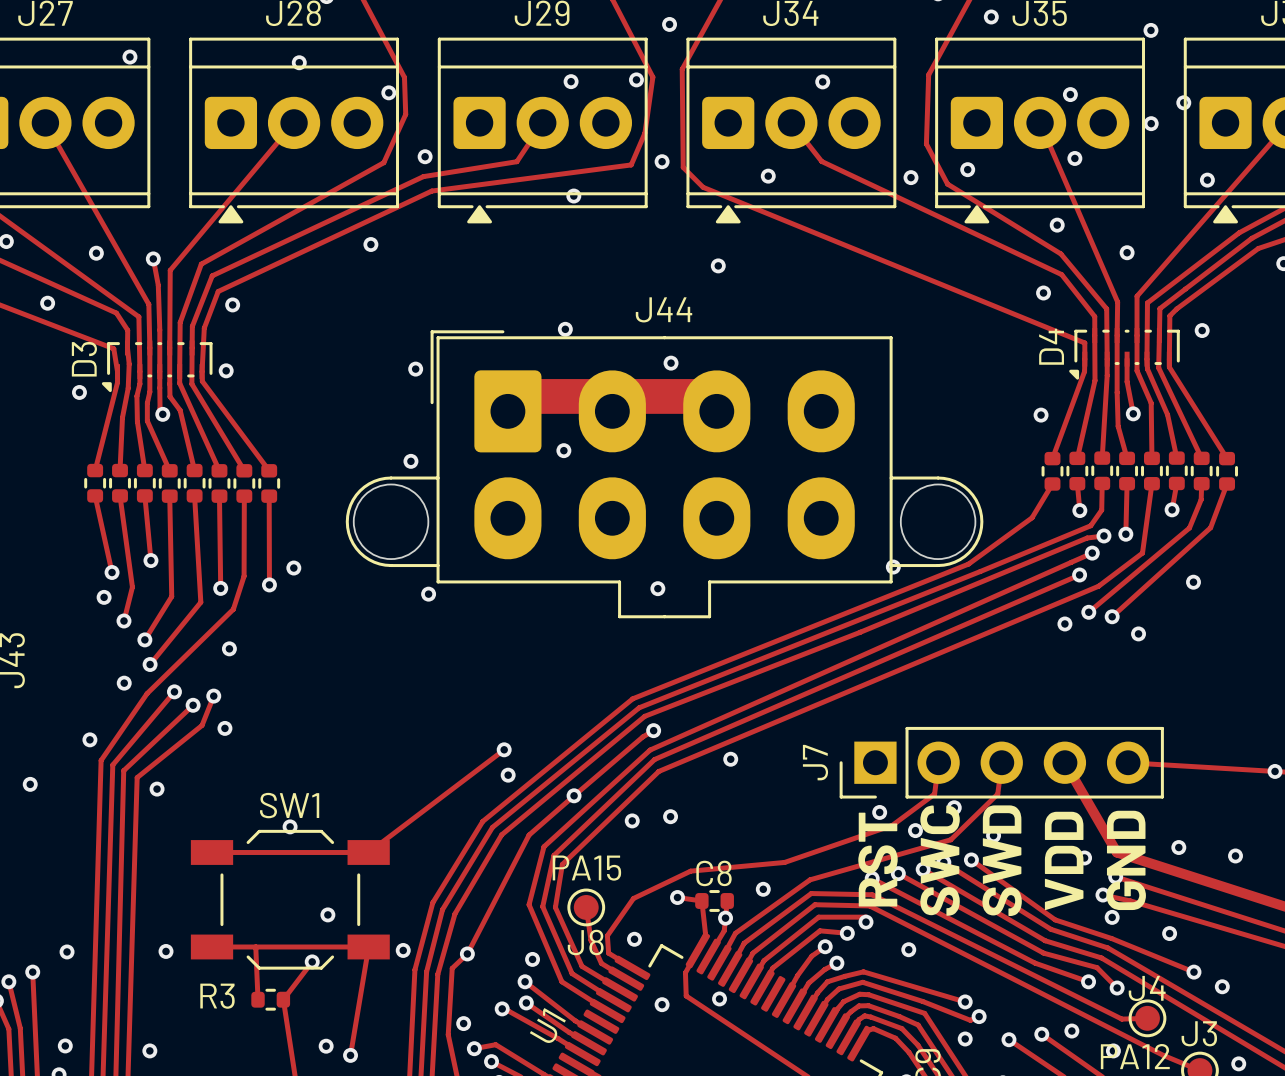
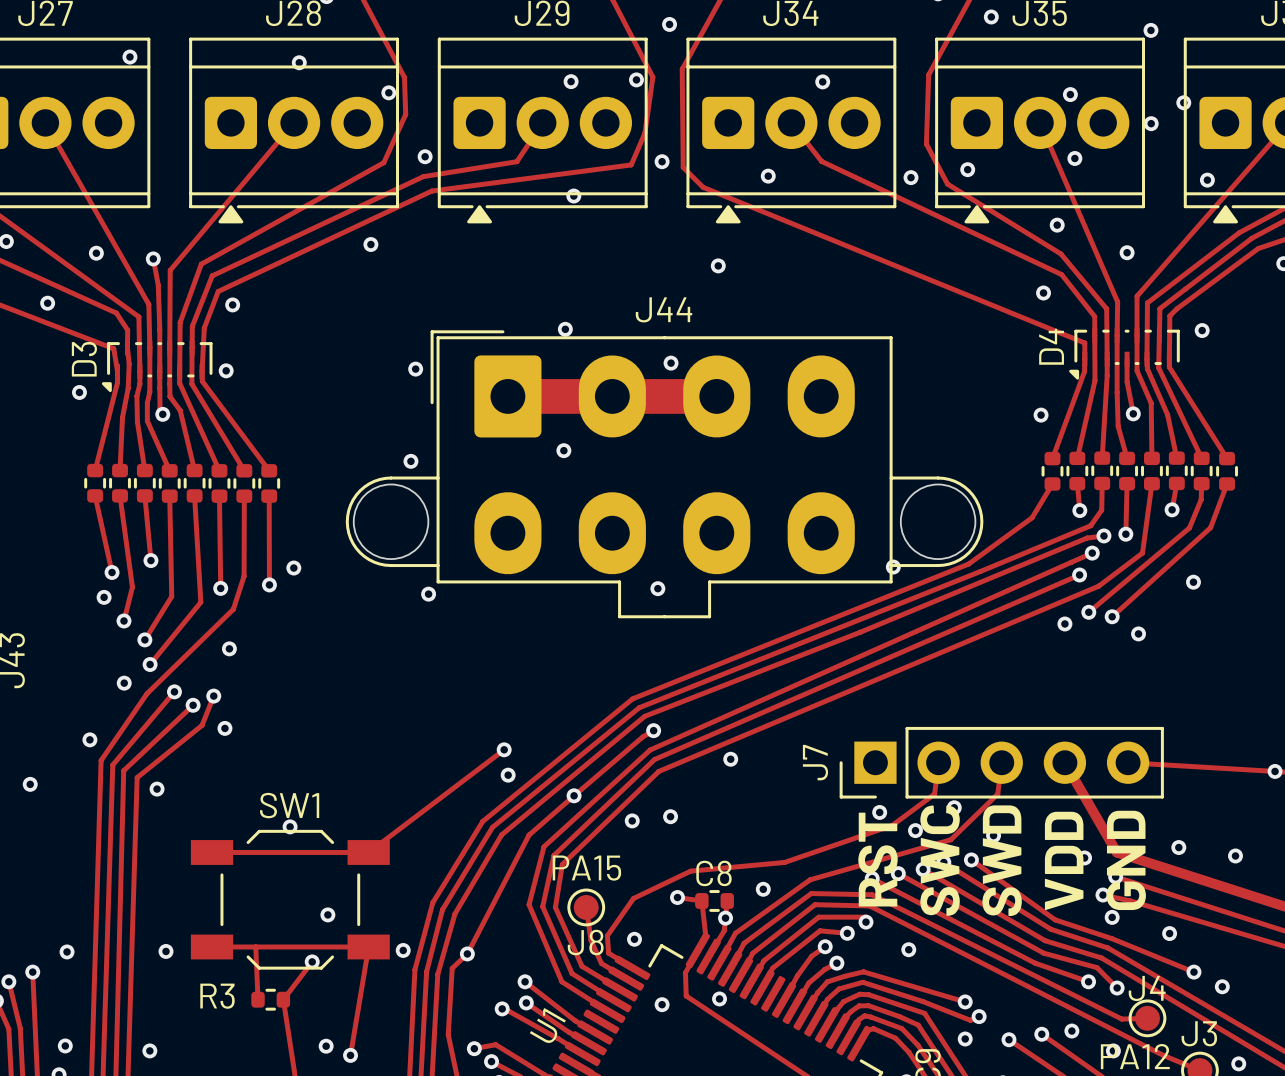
J44 footprint: [345, 330, 984, 619] -> [345, 330, 984, 619]
via: (532, 959) -> none
via: (463, 1023) -> none

